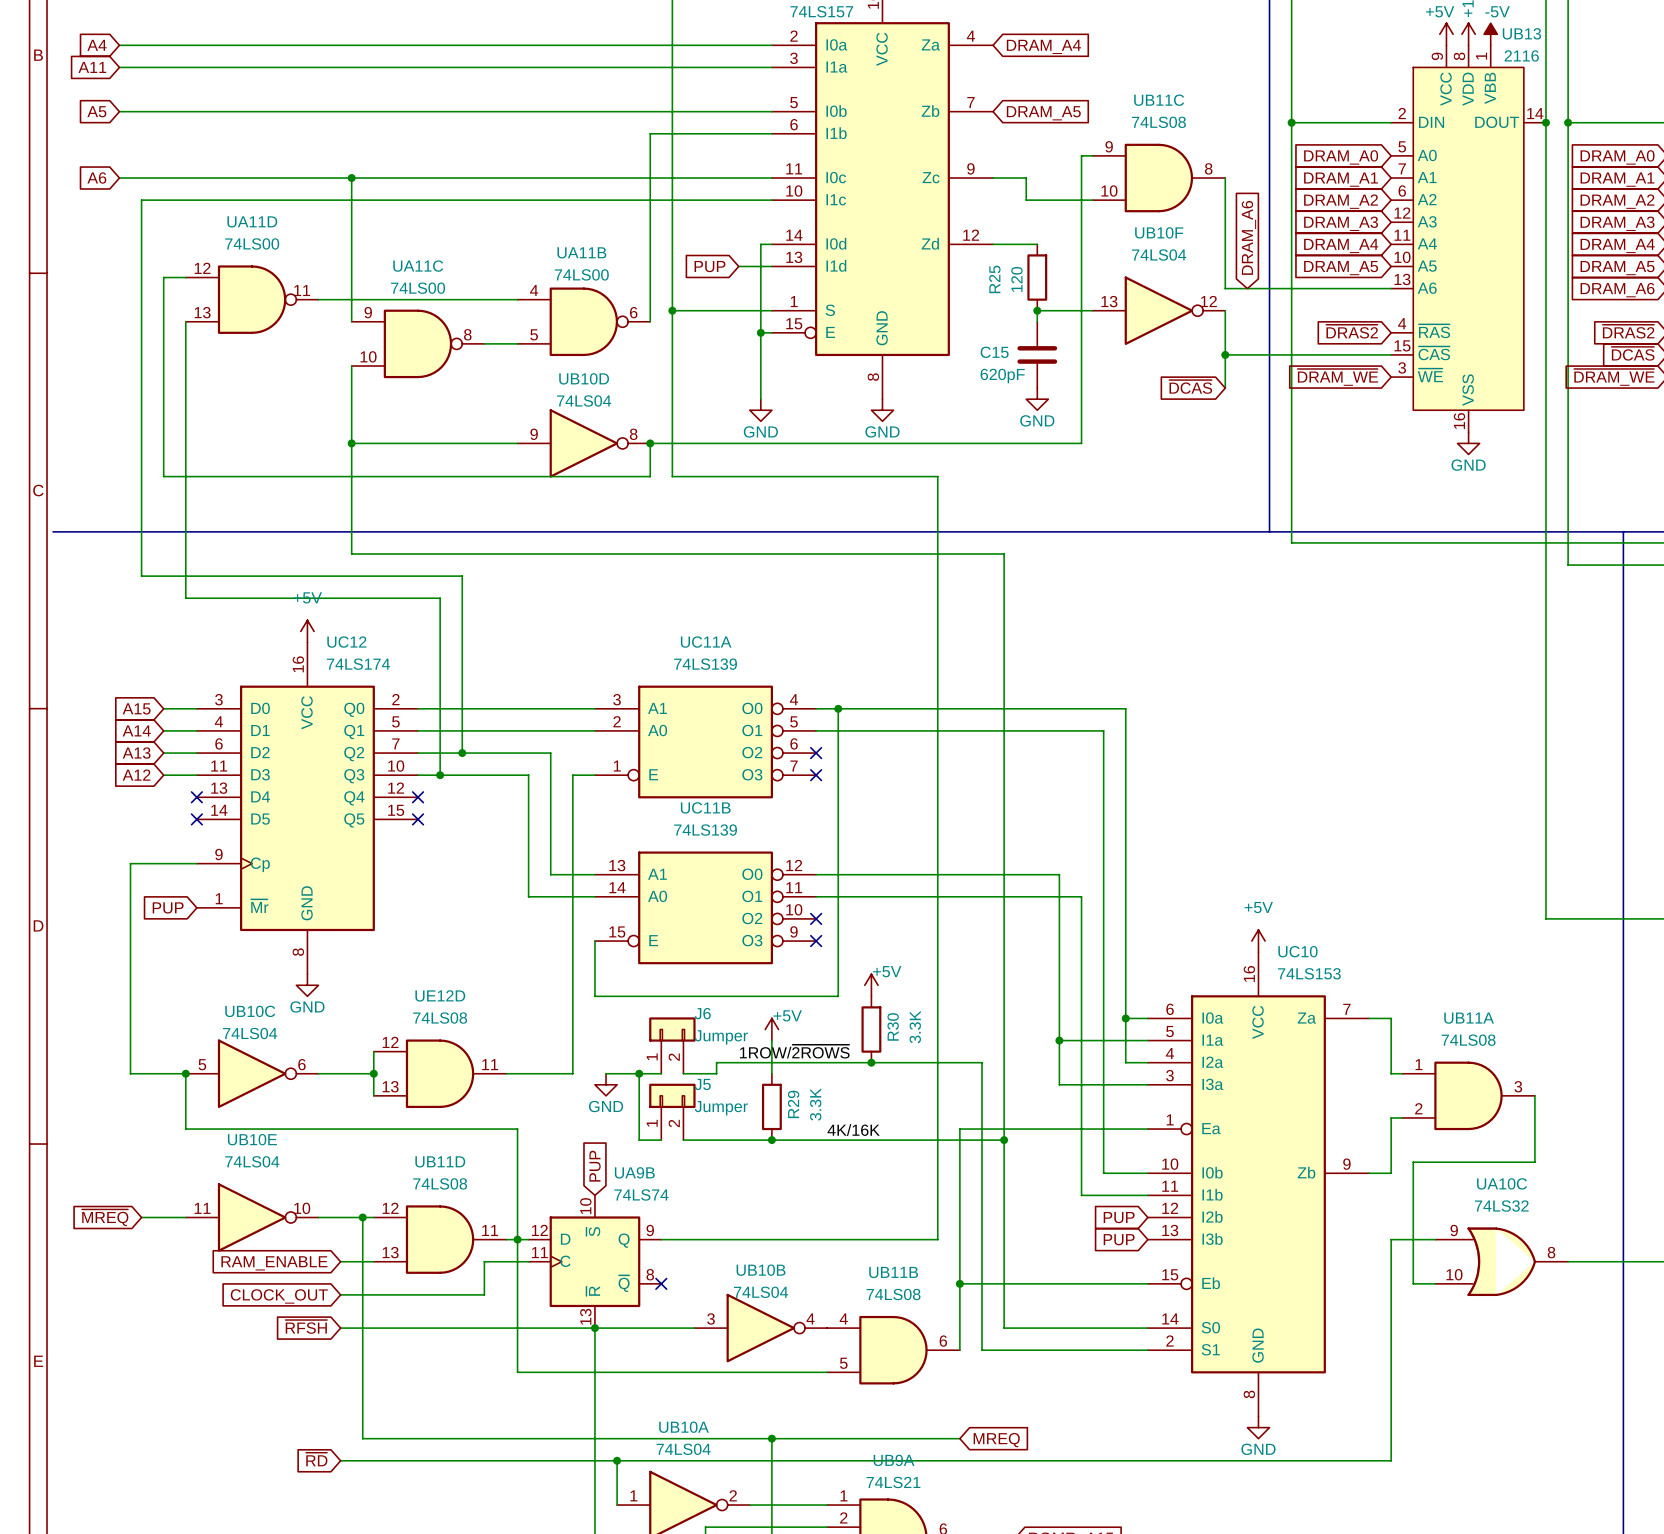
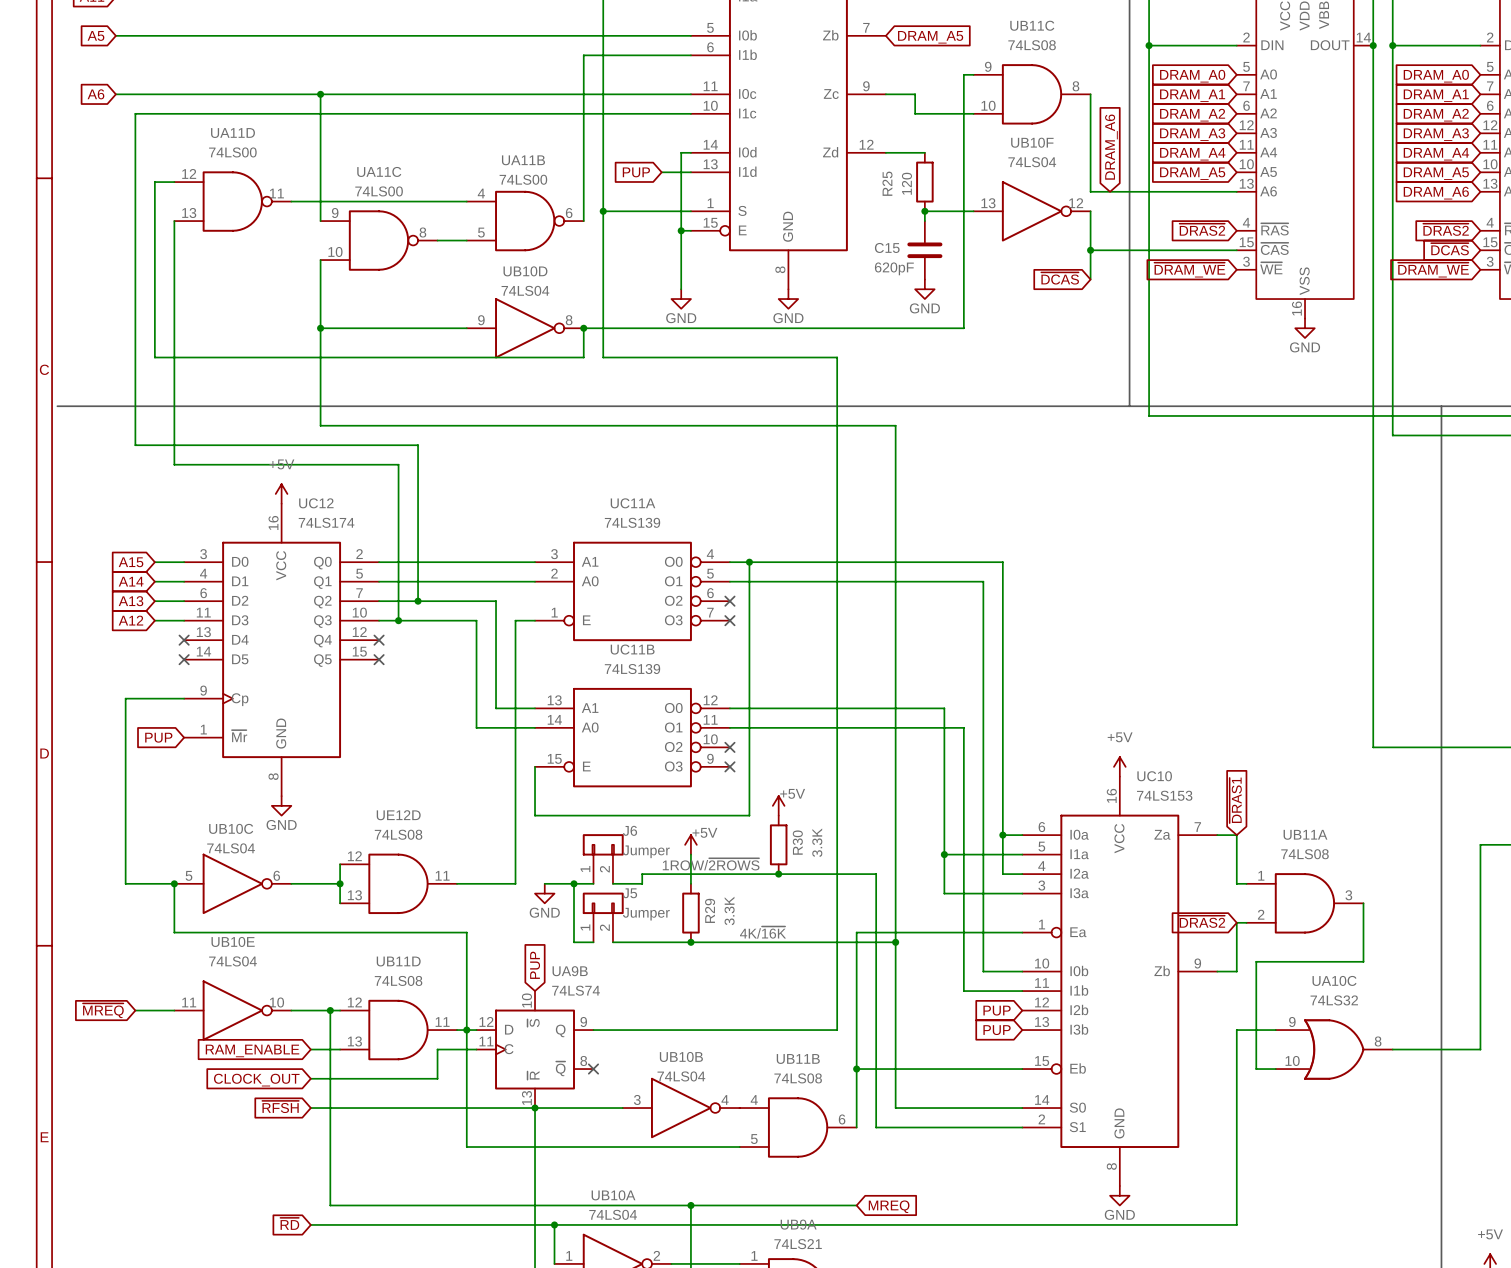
global label: none -> ~{DRAS1} (1235, 800)
global label: none -> ~{DRAS2} (1202, 921)
label: 4K/16K (853, 1130) -> 4K/~{16K} (763, 932)

